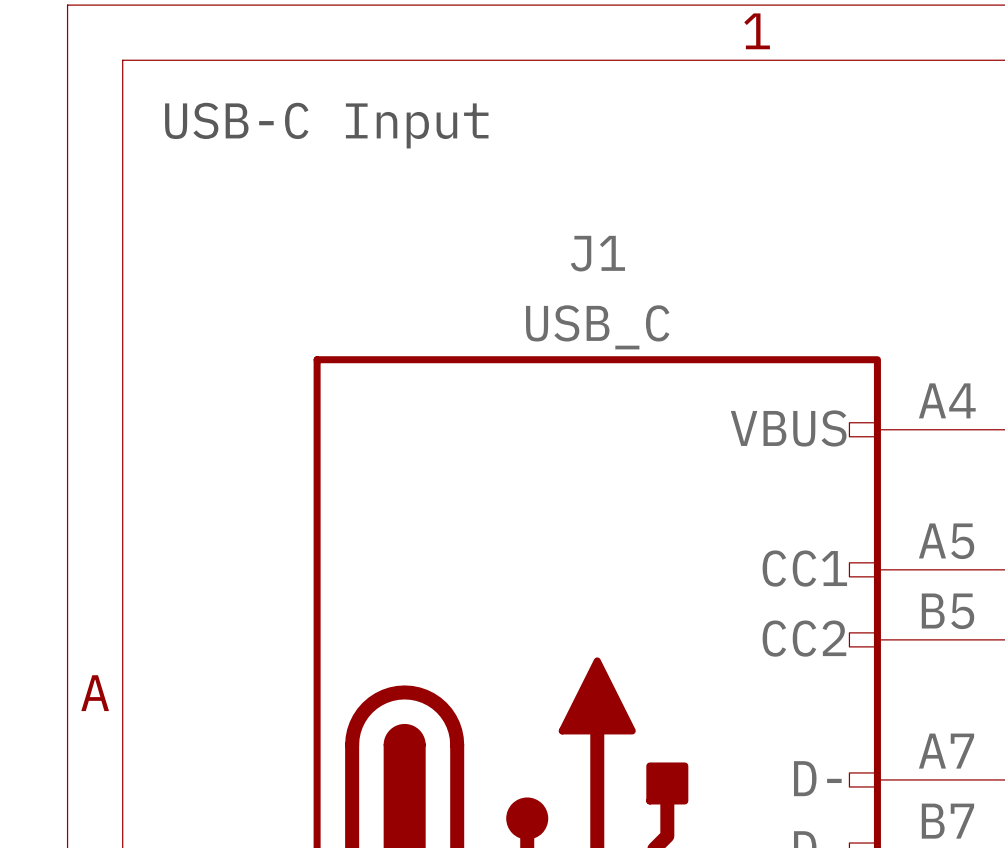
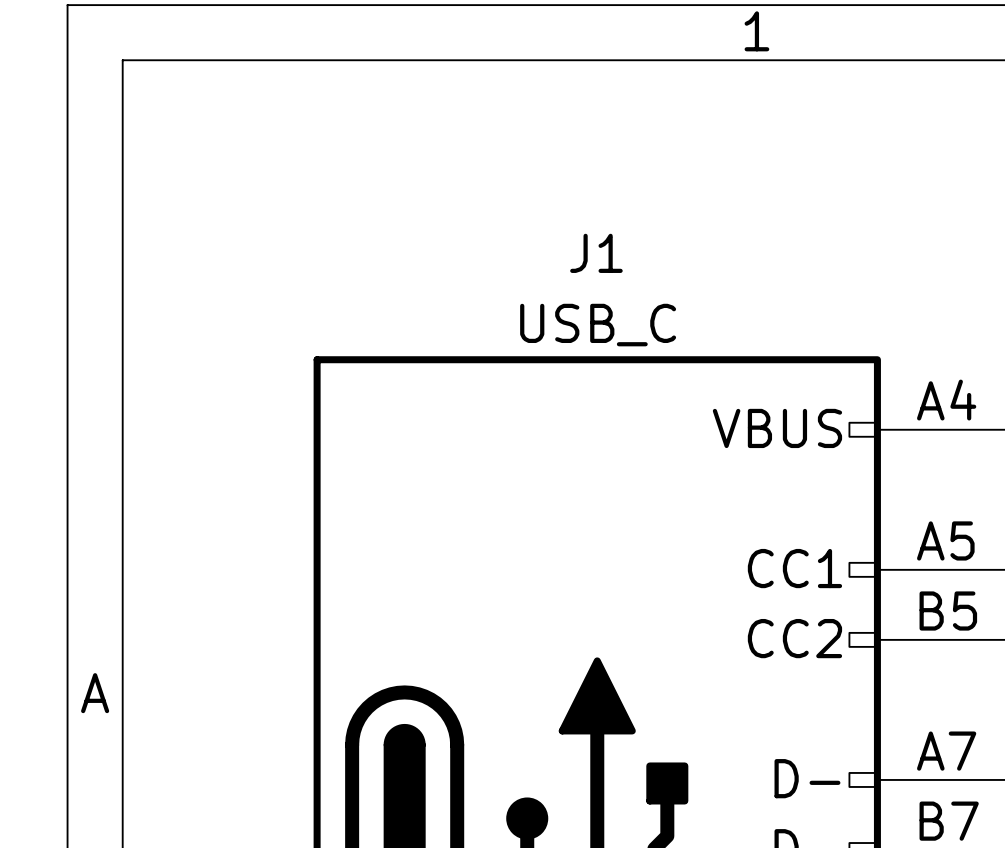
text: USB-C Input (326, 125) -> none

